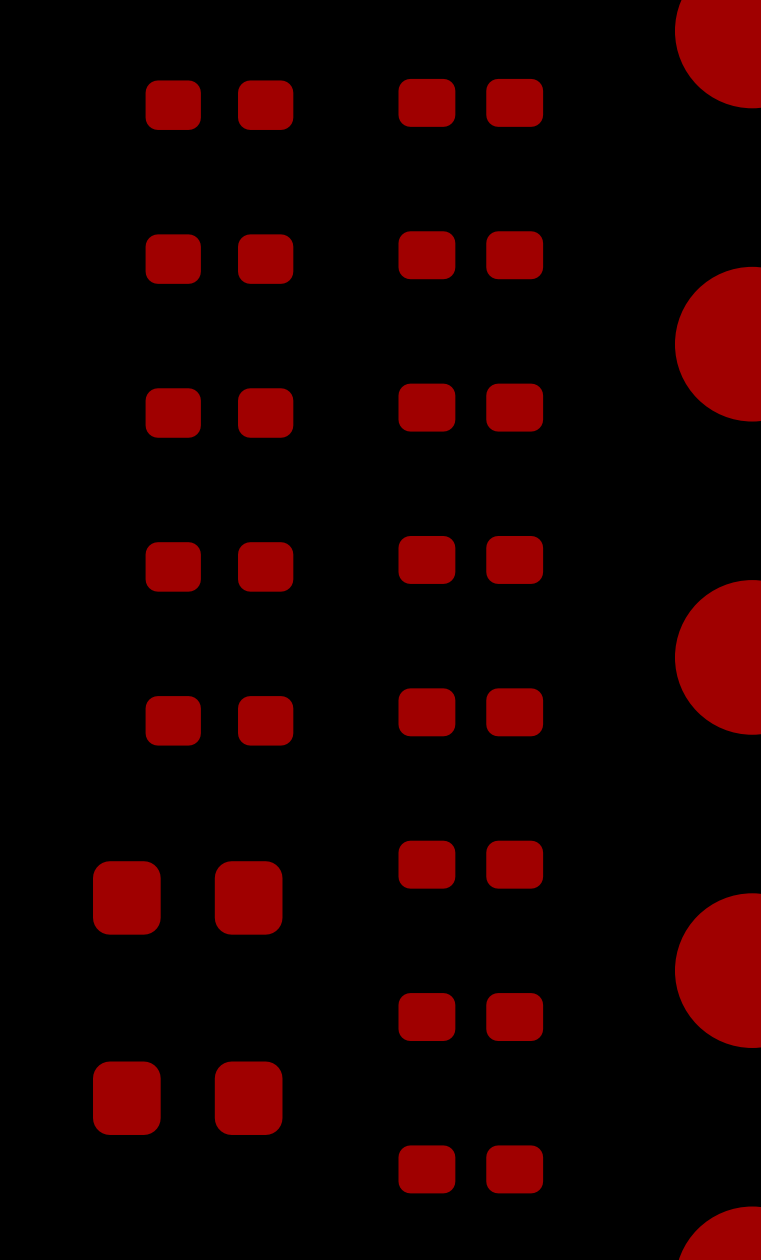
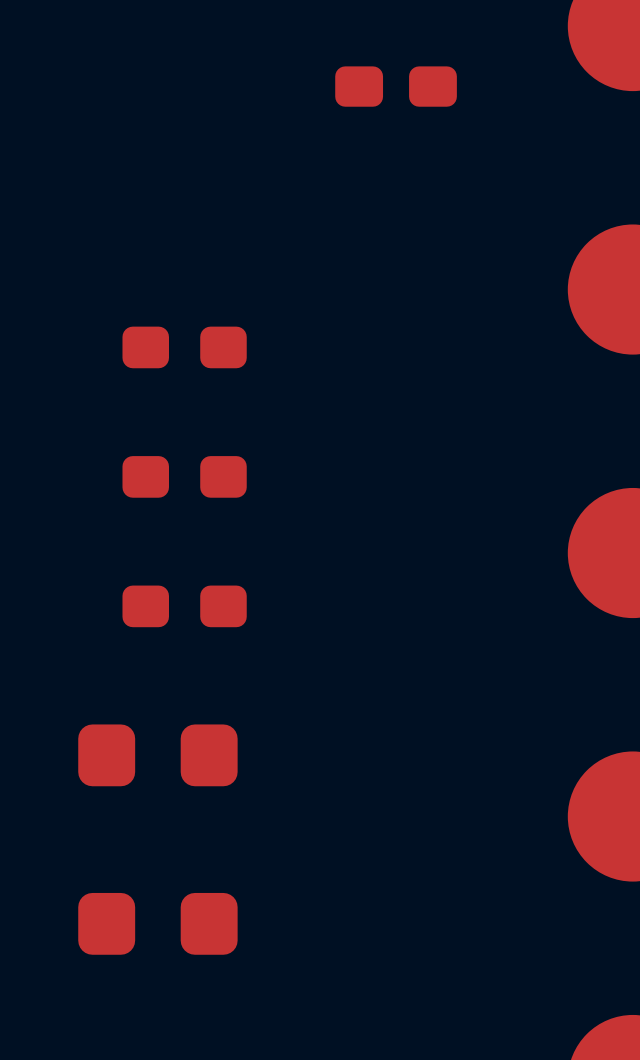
part: (219, 105) -> none
part: (470, 255) -> none
part: (219, 259) -> none
part: (470, 407) -> none
part: (470, 559) -> none
part: (470, 712) -> none
part: (470, 864) -> none
part: (470, 1017) -> none
part: (470, 1169) -> none

